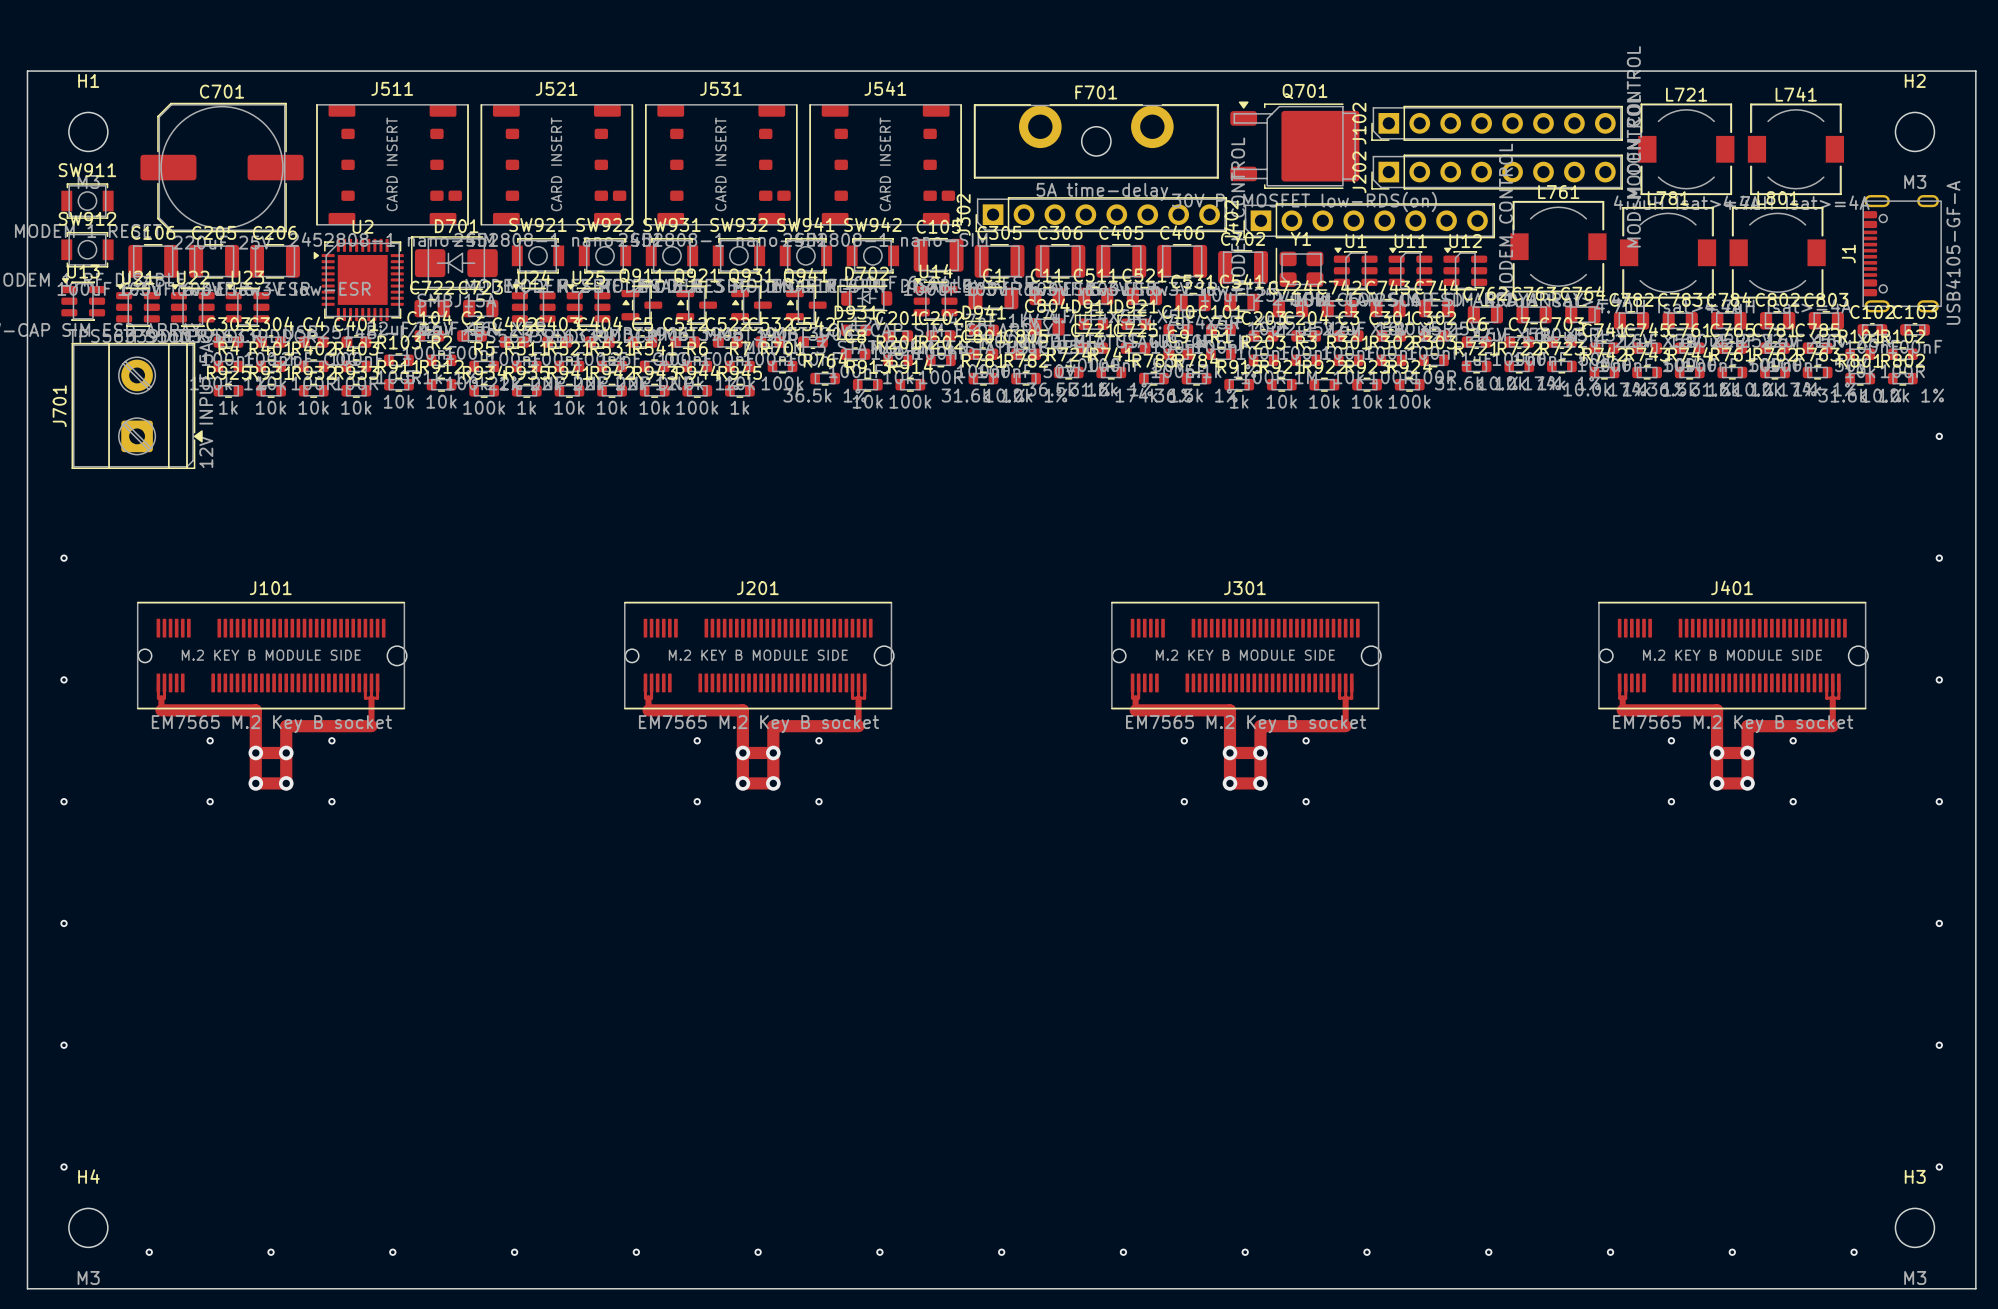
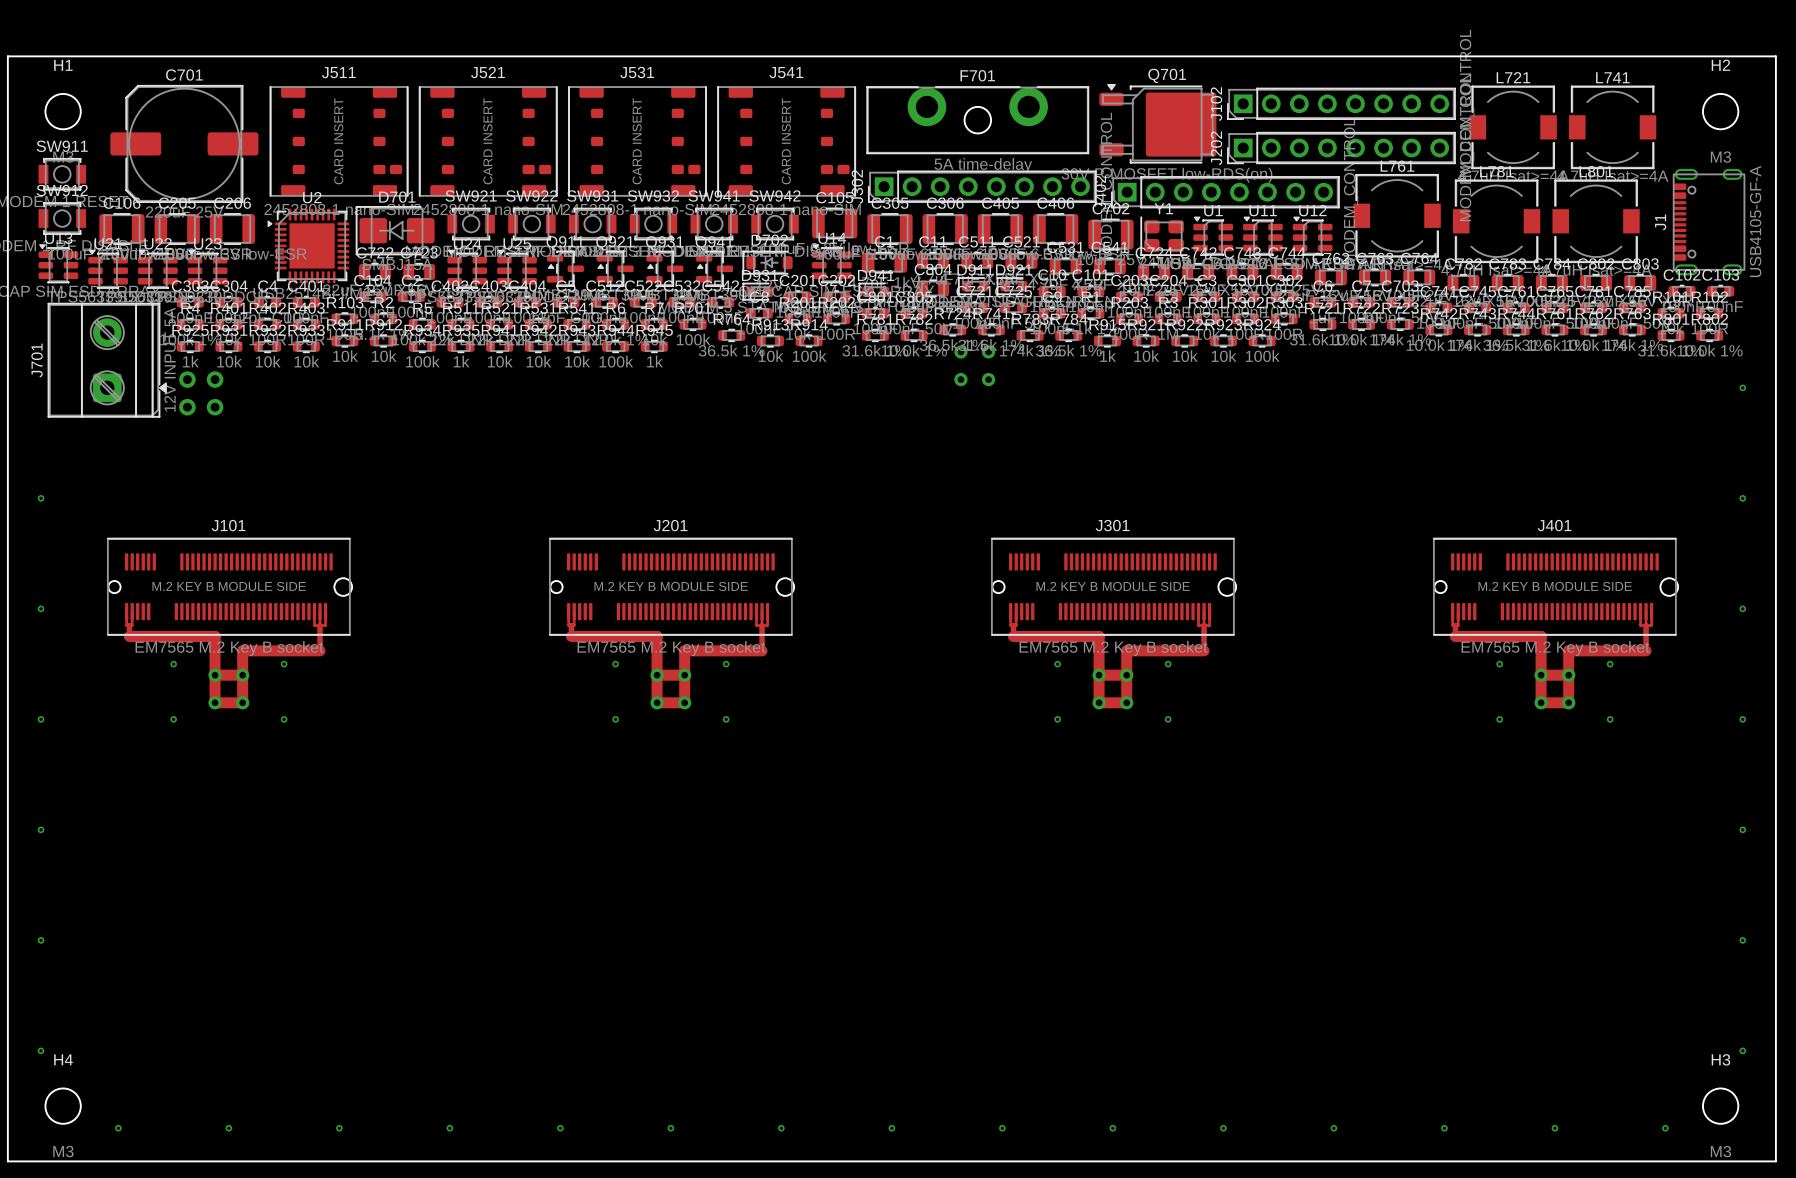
via: none -> (960, 351)
via: none -> (988, 351)
via: none -> (187, 379)
via: none -> (215, 379)
via: none -> (960, 379)
via: none -> (988, 379)
via: none -> (187, 407)
via: none -> (215, 407)

